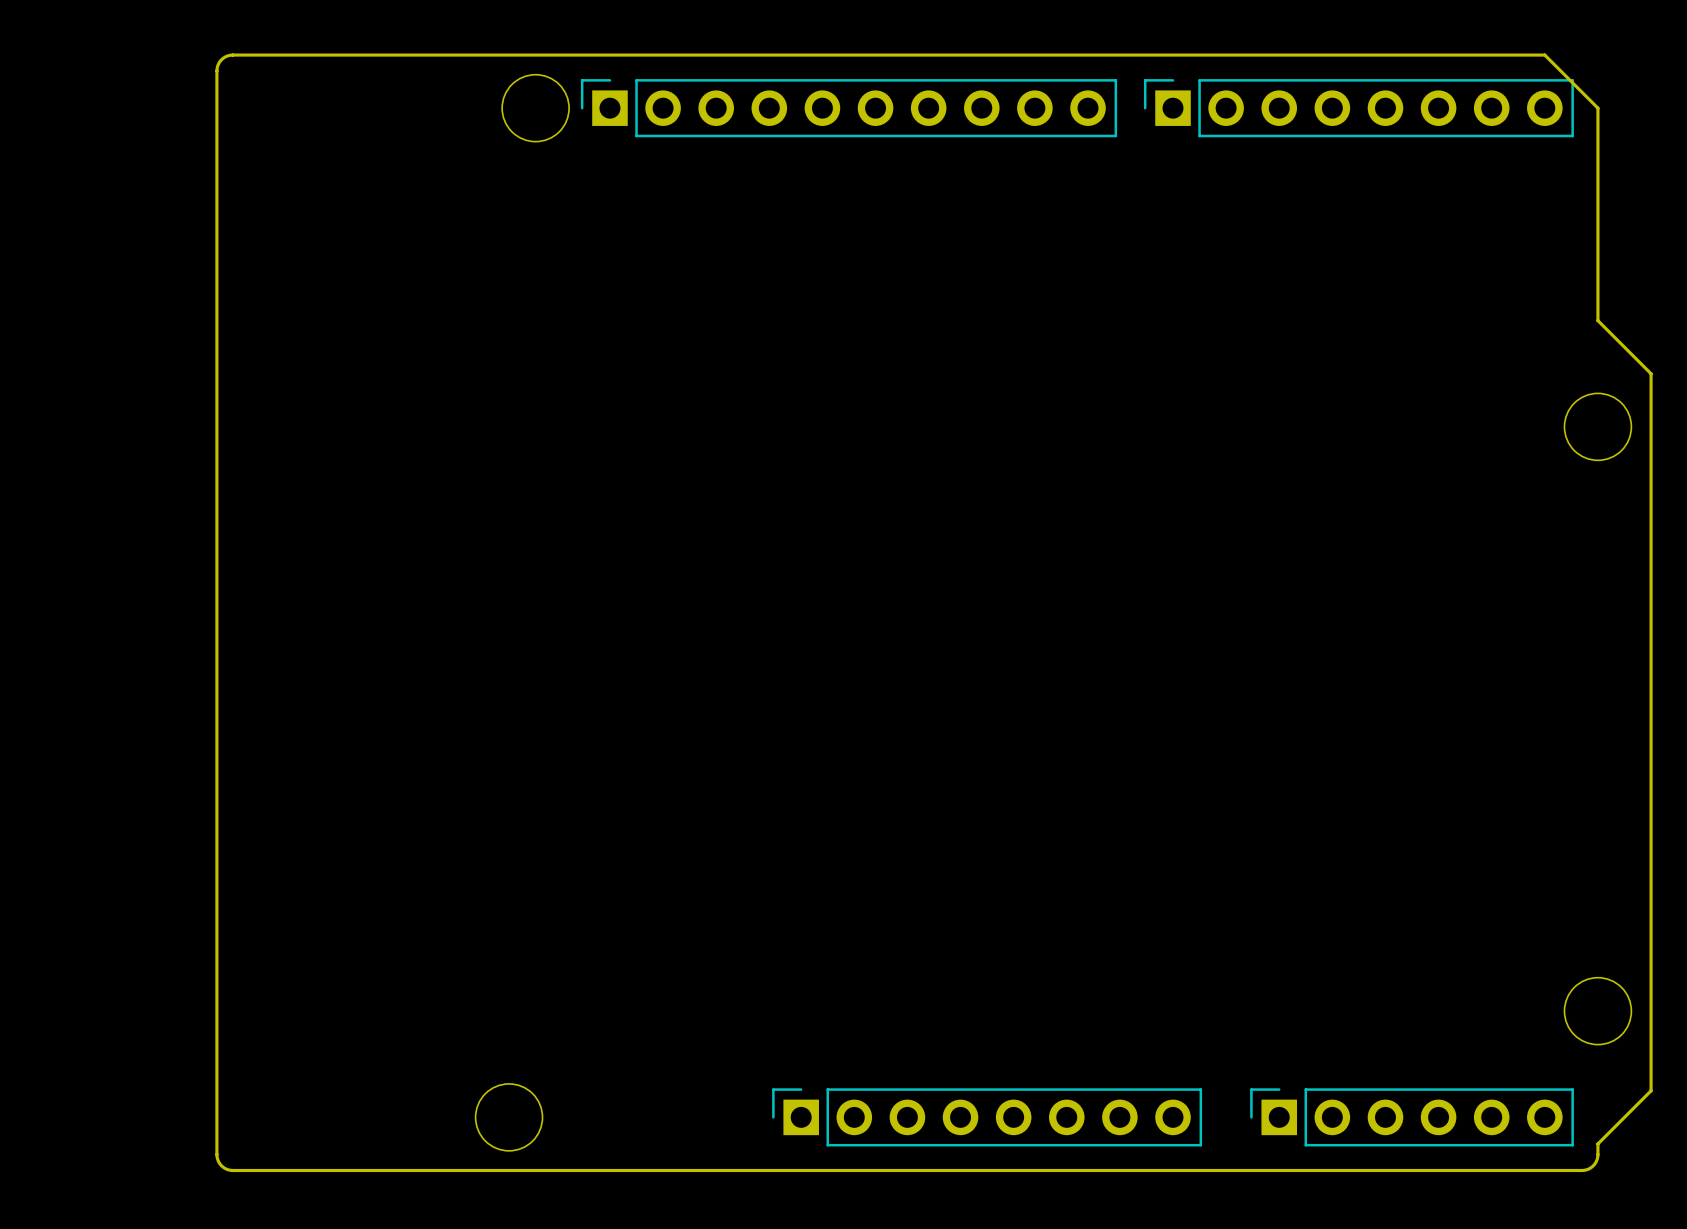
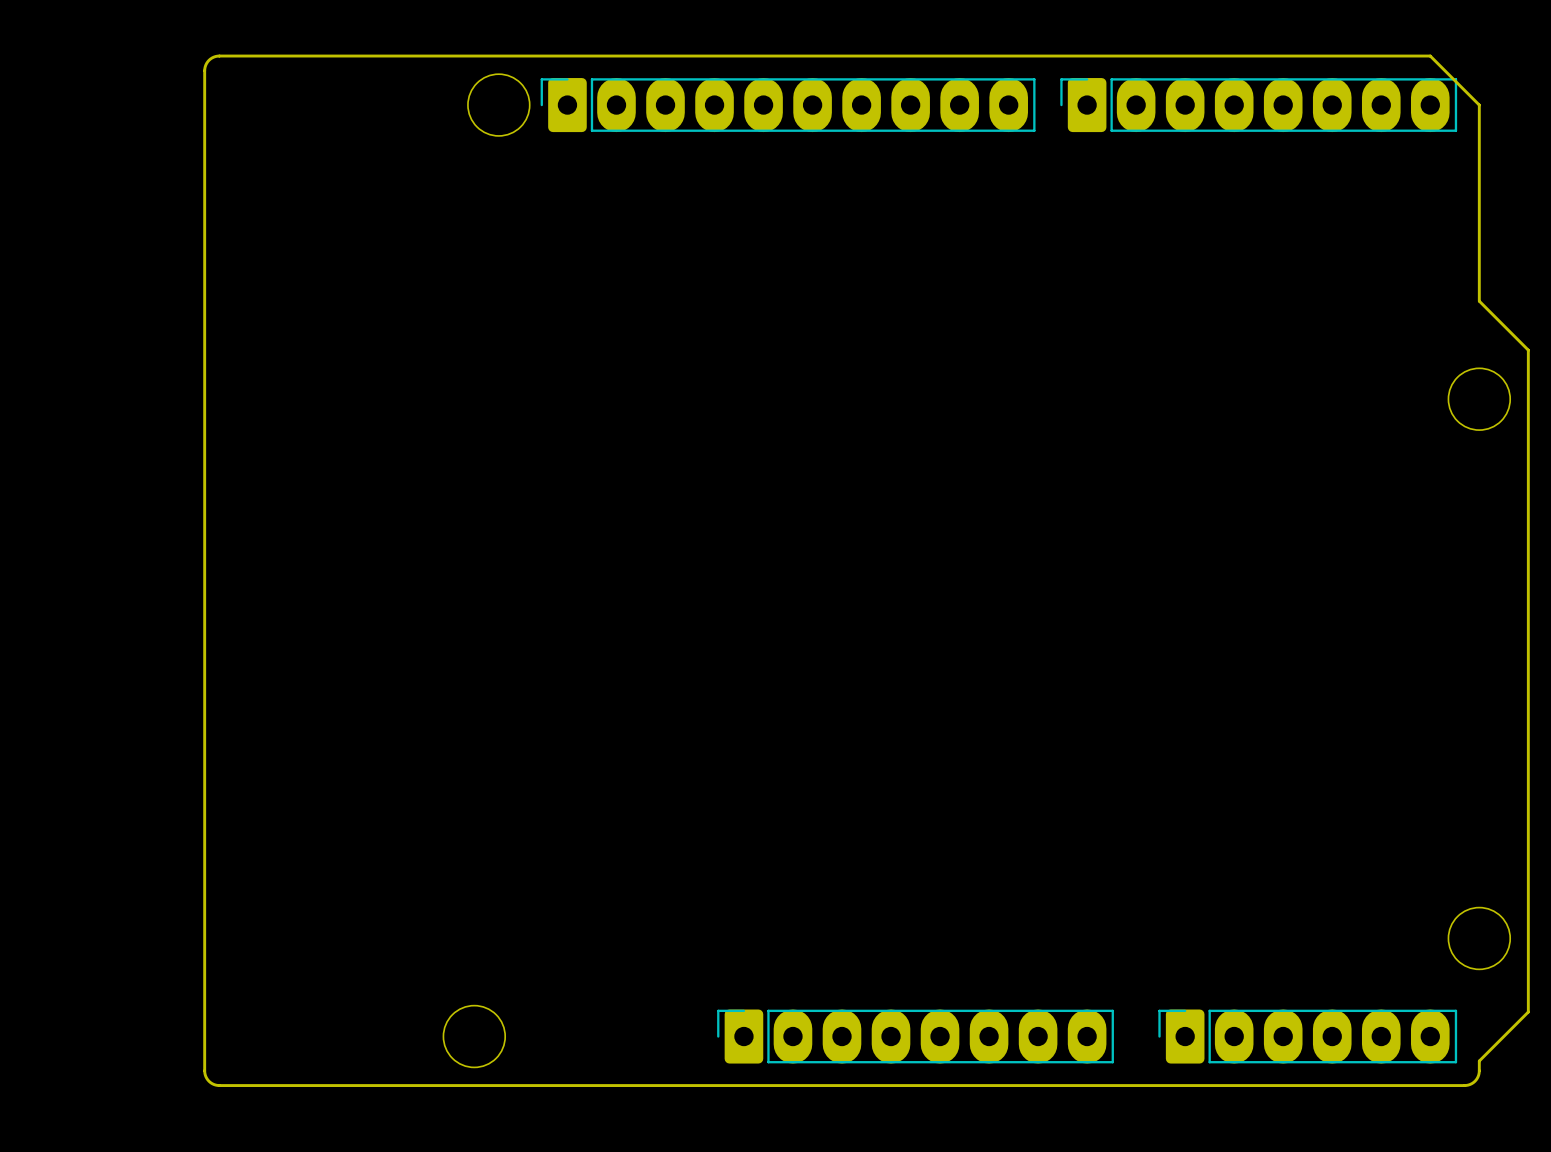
part footprint: [580, 79, 1118, 138] -> [540, 78, 1036, 133]
part footprint: [1143, 79, 1574, 138] -> [1060, 78, 1458, 133]
part footprint: [772, 1088, 1203, 1147] -> [717, 1009, 1114, 1064]
part footprint: [1250, 1088, 1574, 1147] -> [1158, 1009, 1458, 1064]

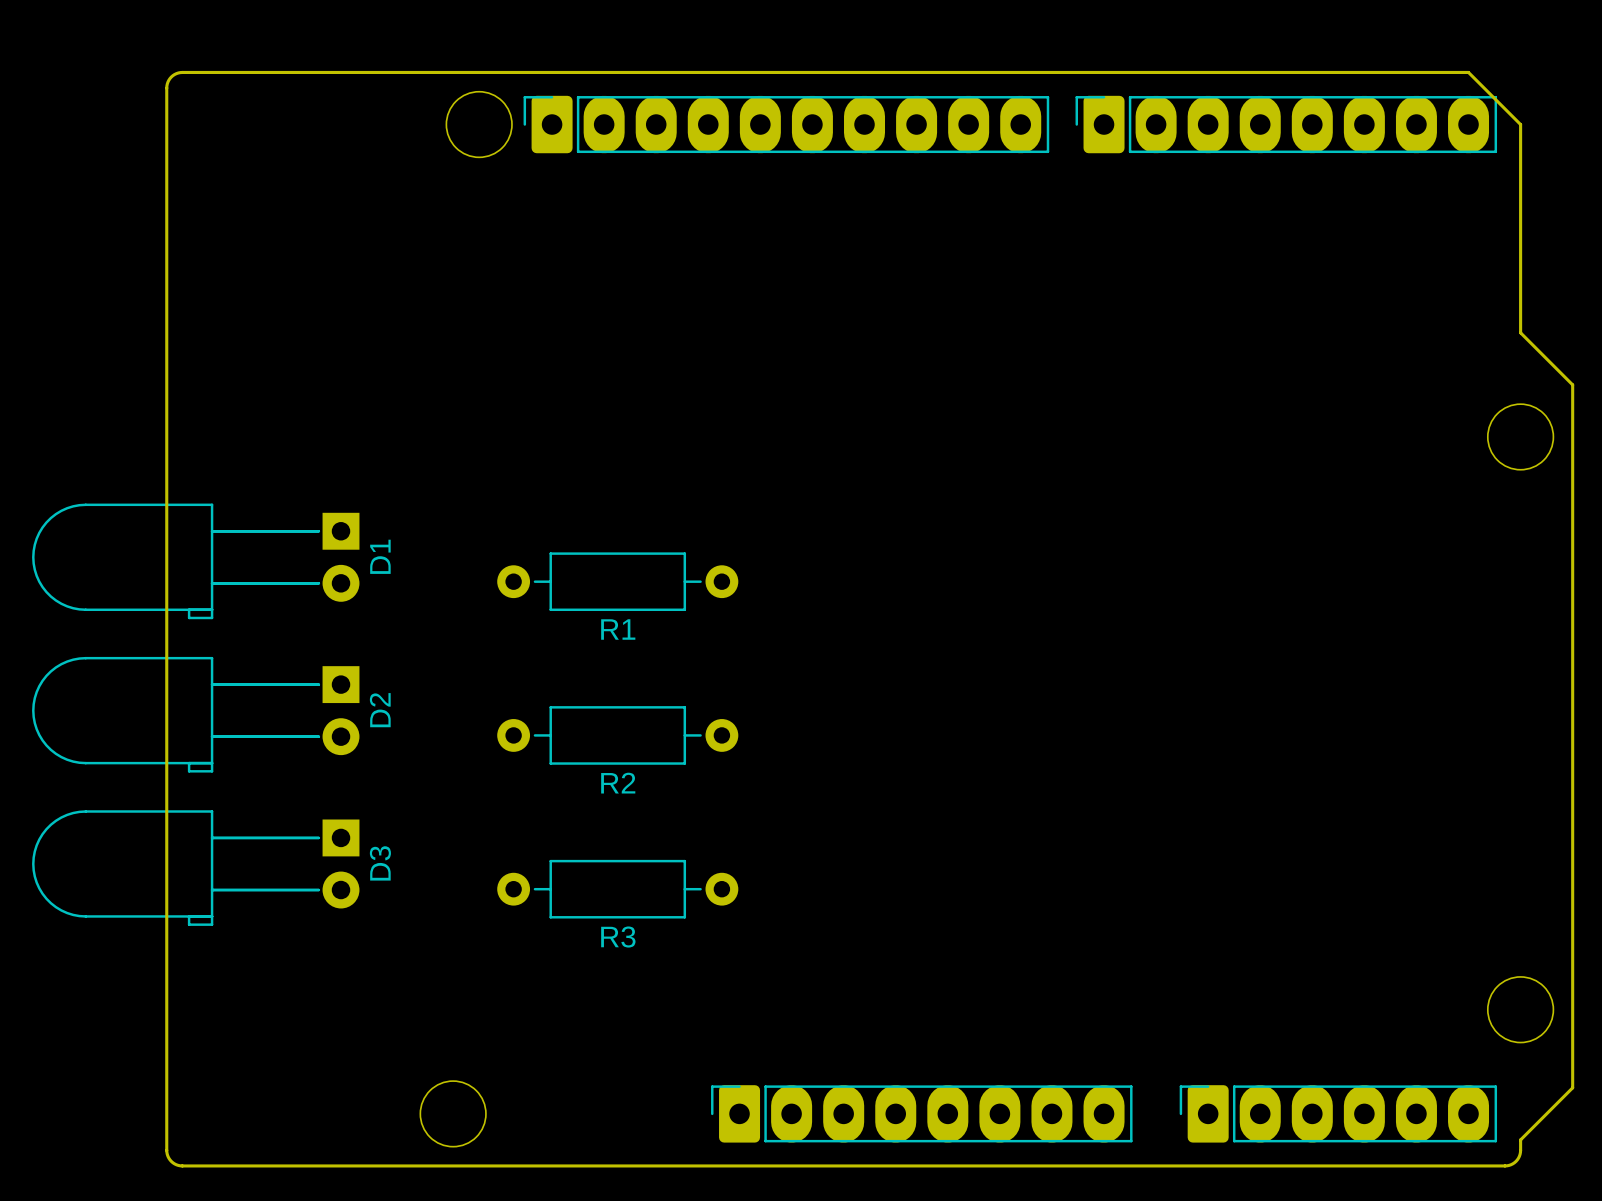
D1: none -> (195, 561)
R1: none -> (617, 581)
D2: none -> (195, 714)
R2: none -> (617, 735)
D3: none -> (195, 868)
R3: none -> (617, 889)

